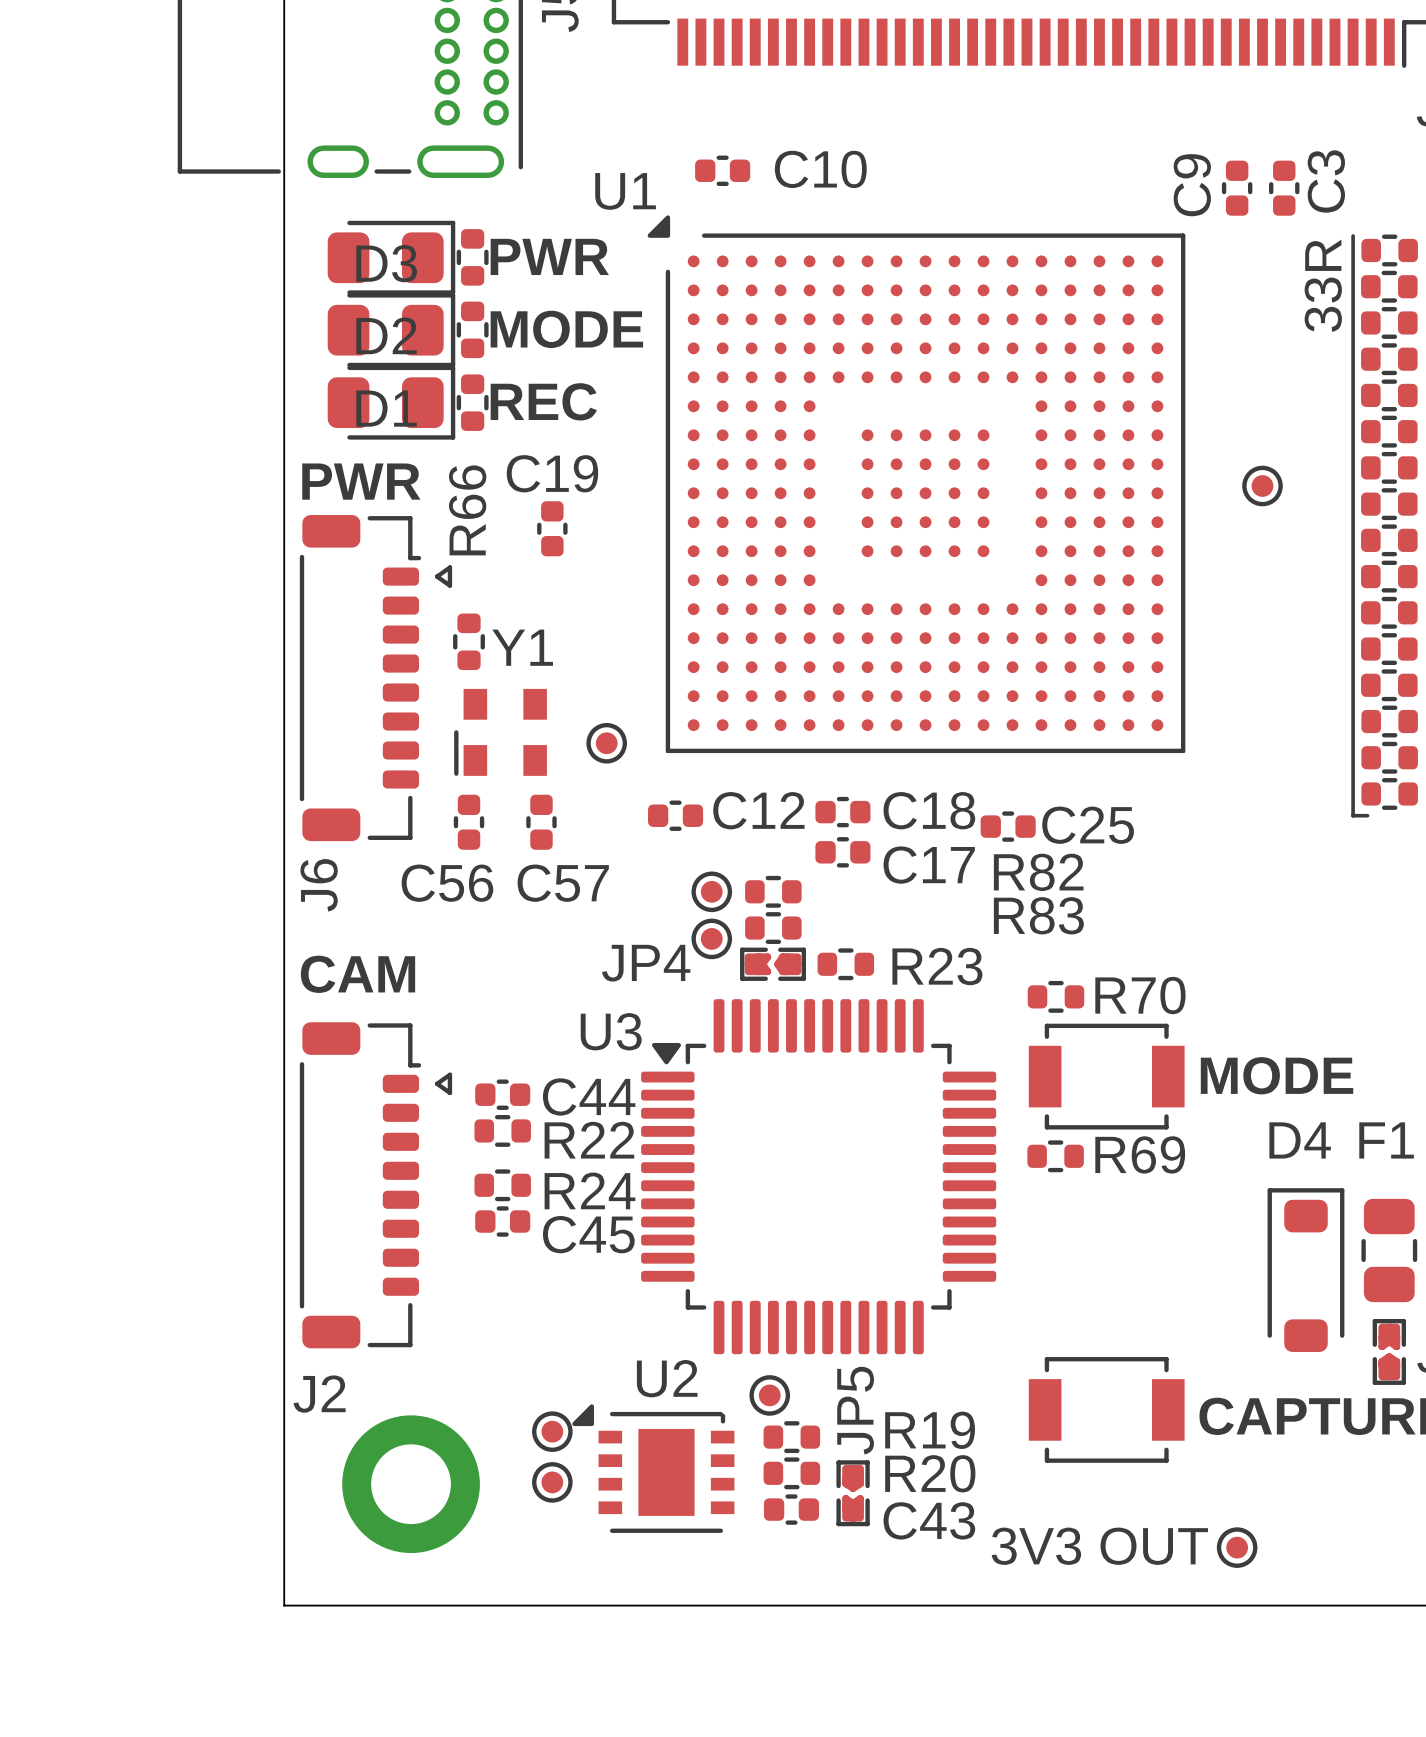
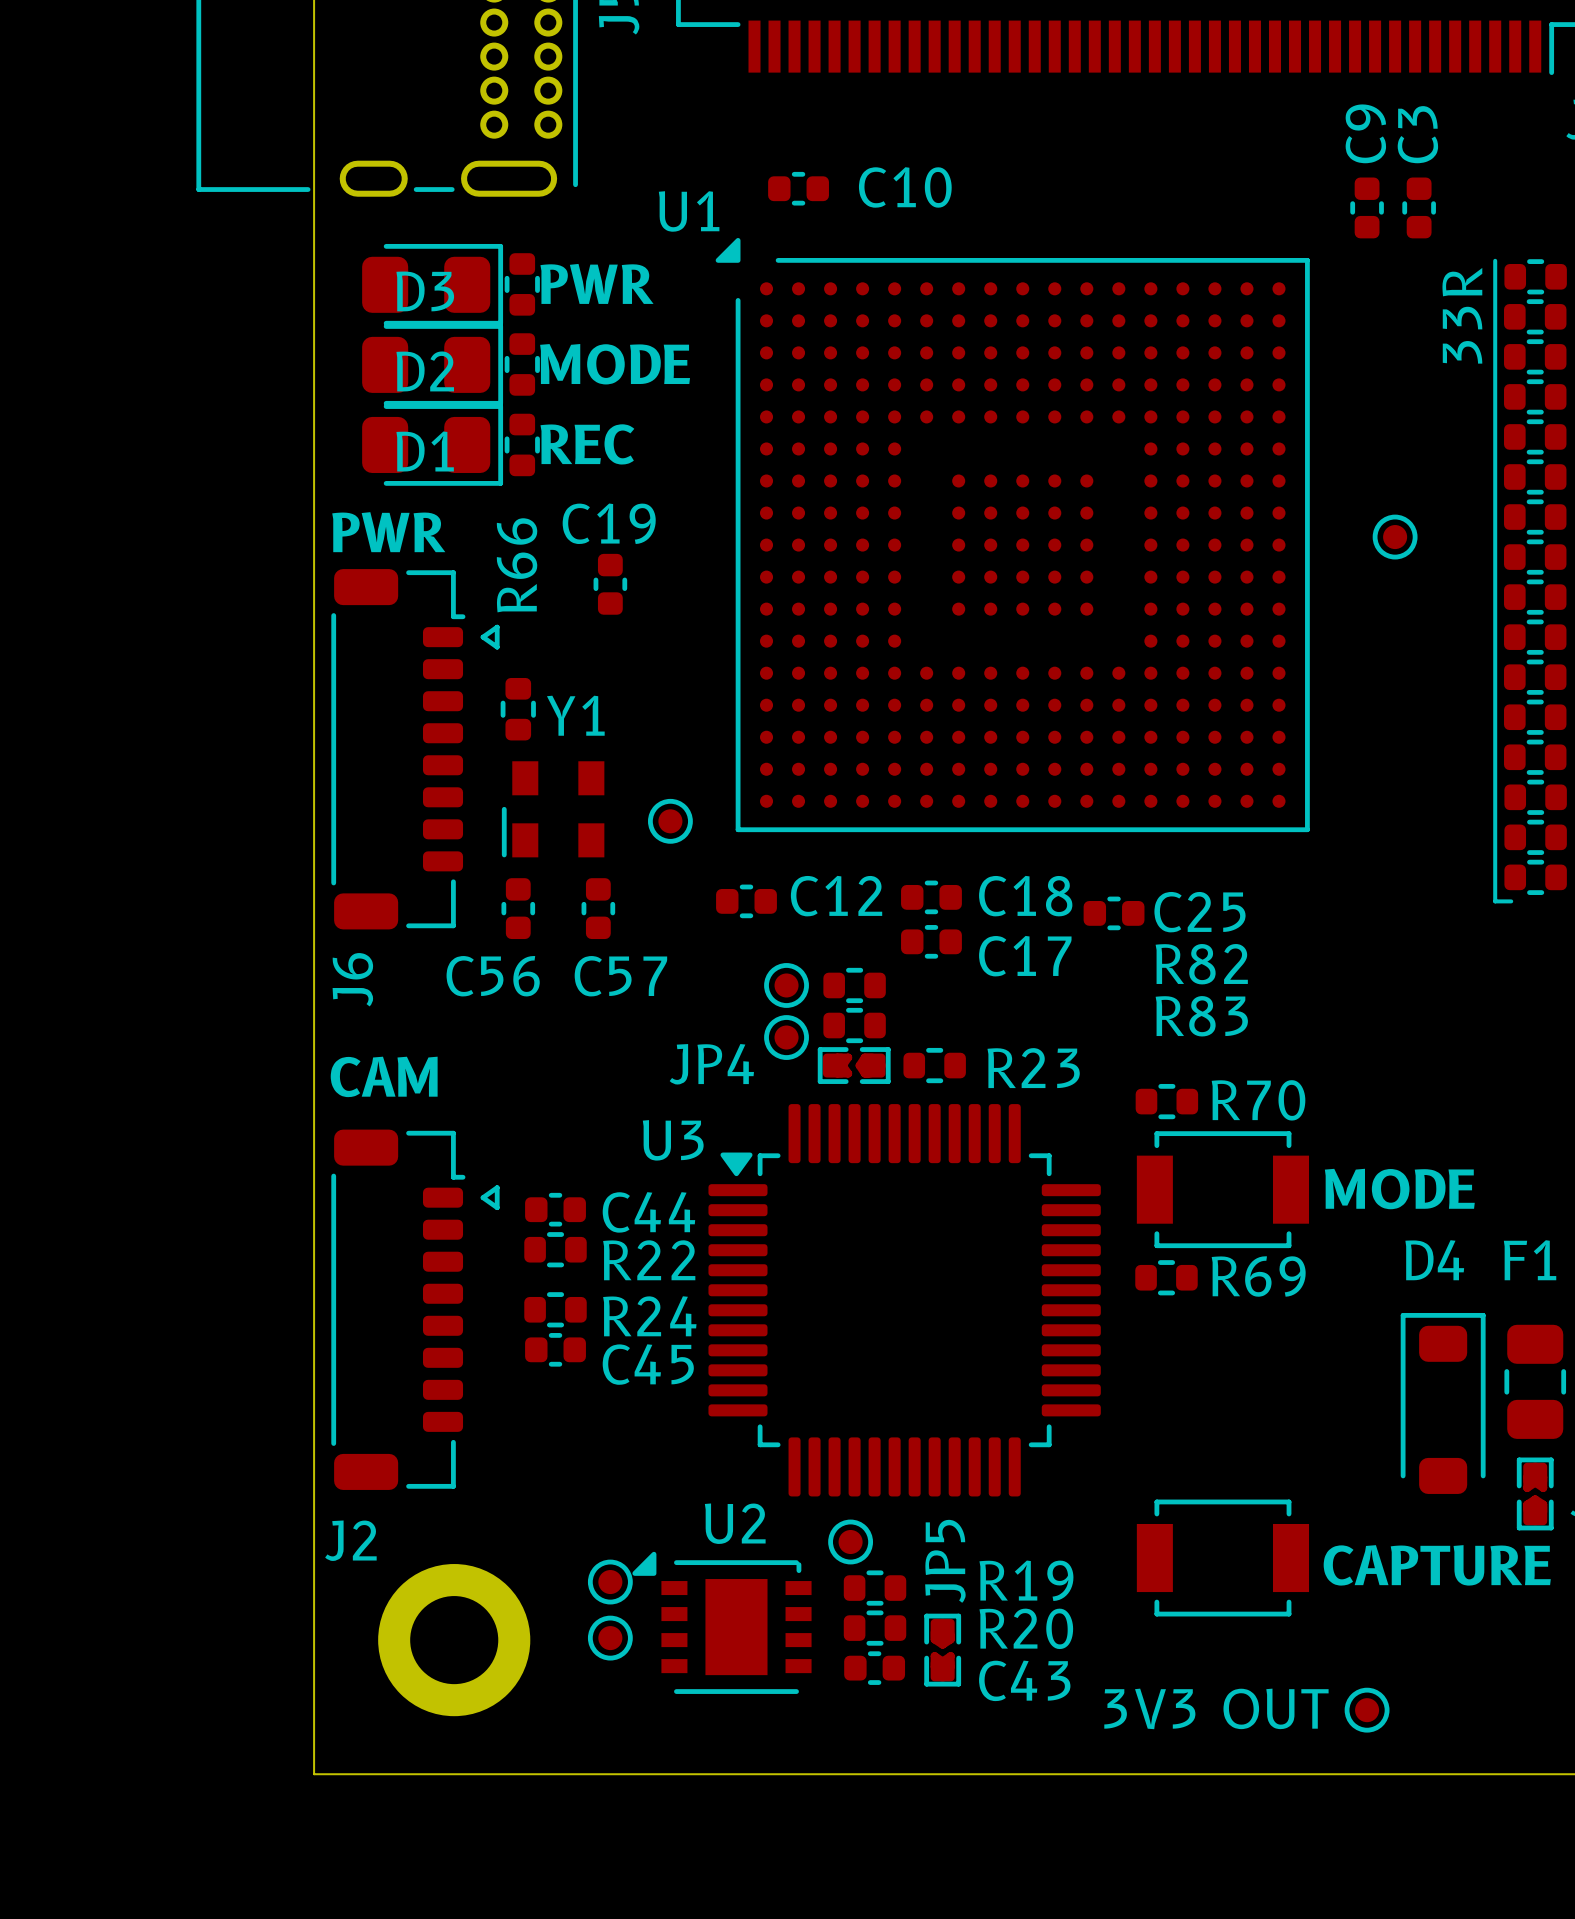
C3 name position: C3 (1326, 181) -> C3 (1417, 134)
C9 name position: C9 (1192, 185) -> C9 (1365, 133)
R82 name position: R82 (1038, 872) -> R82 (1201, 964)
R83 name position: R83 (1038, 915) -> R83 (1201, 1016)

